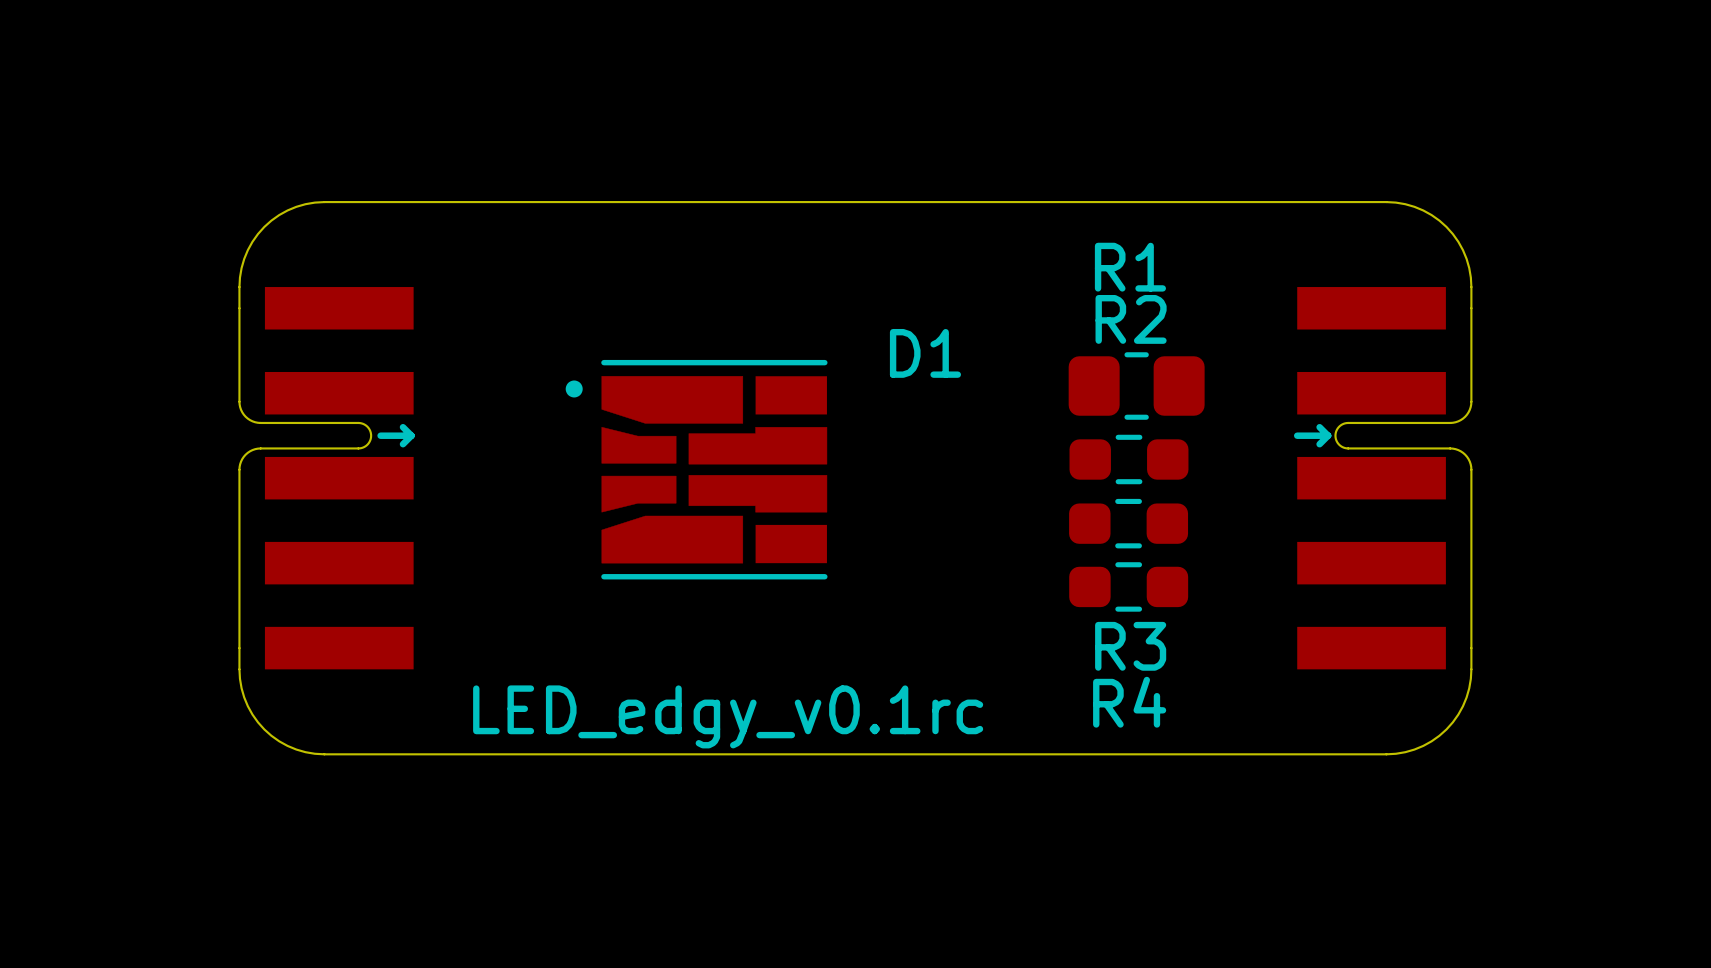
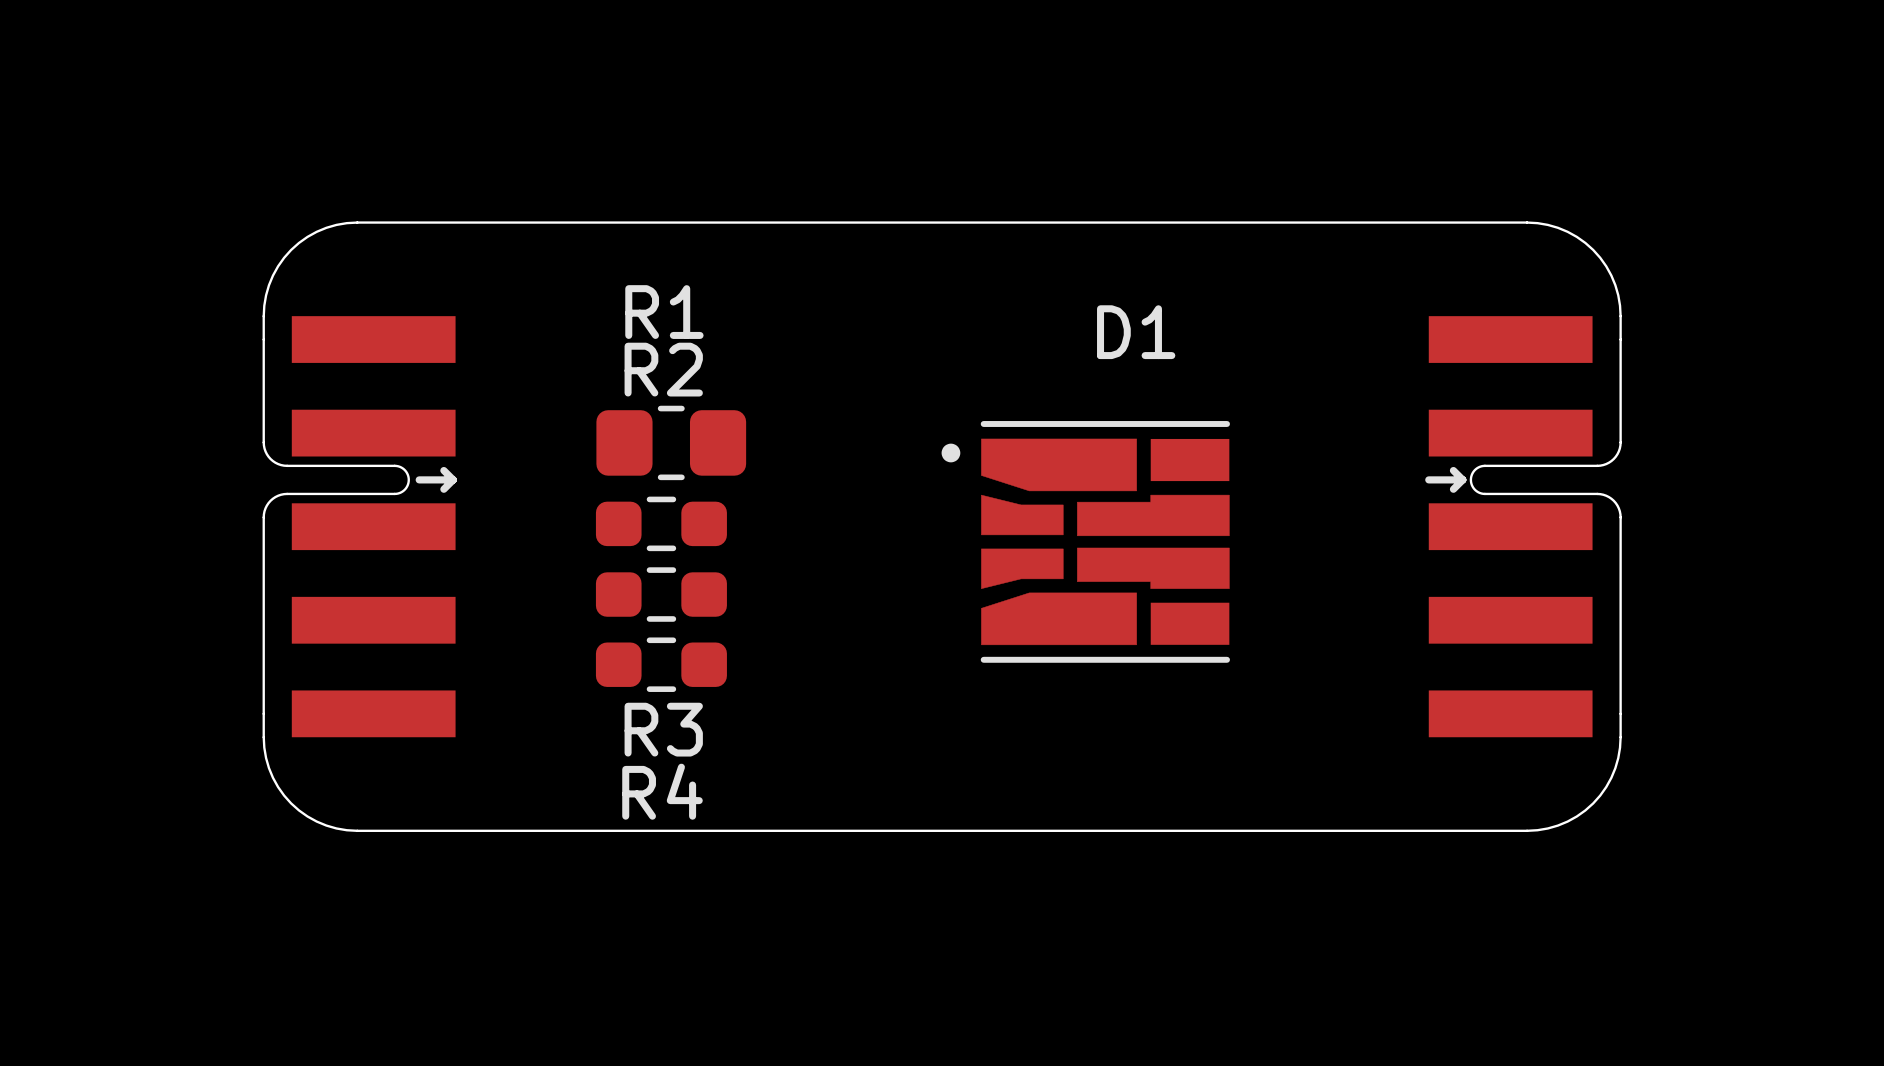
D1 name position: D1 (925, 353) -> D1 (1136, 332)
R1 position: (1136, 386) -> (671, 442)
R2 position: (1128, 459) -> (661, 523)
D1 position: (696, 469) -> (1085, 541)
R3 position: (1128, 523) -> (661, 594)
R4 position: (1128, 586) -> (661, 664)
text: LED_edgy_v0.1rc (728, 716) -> none

